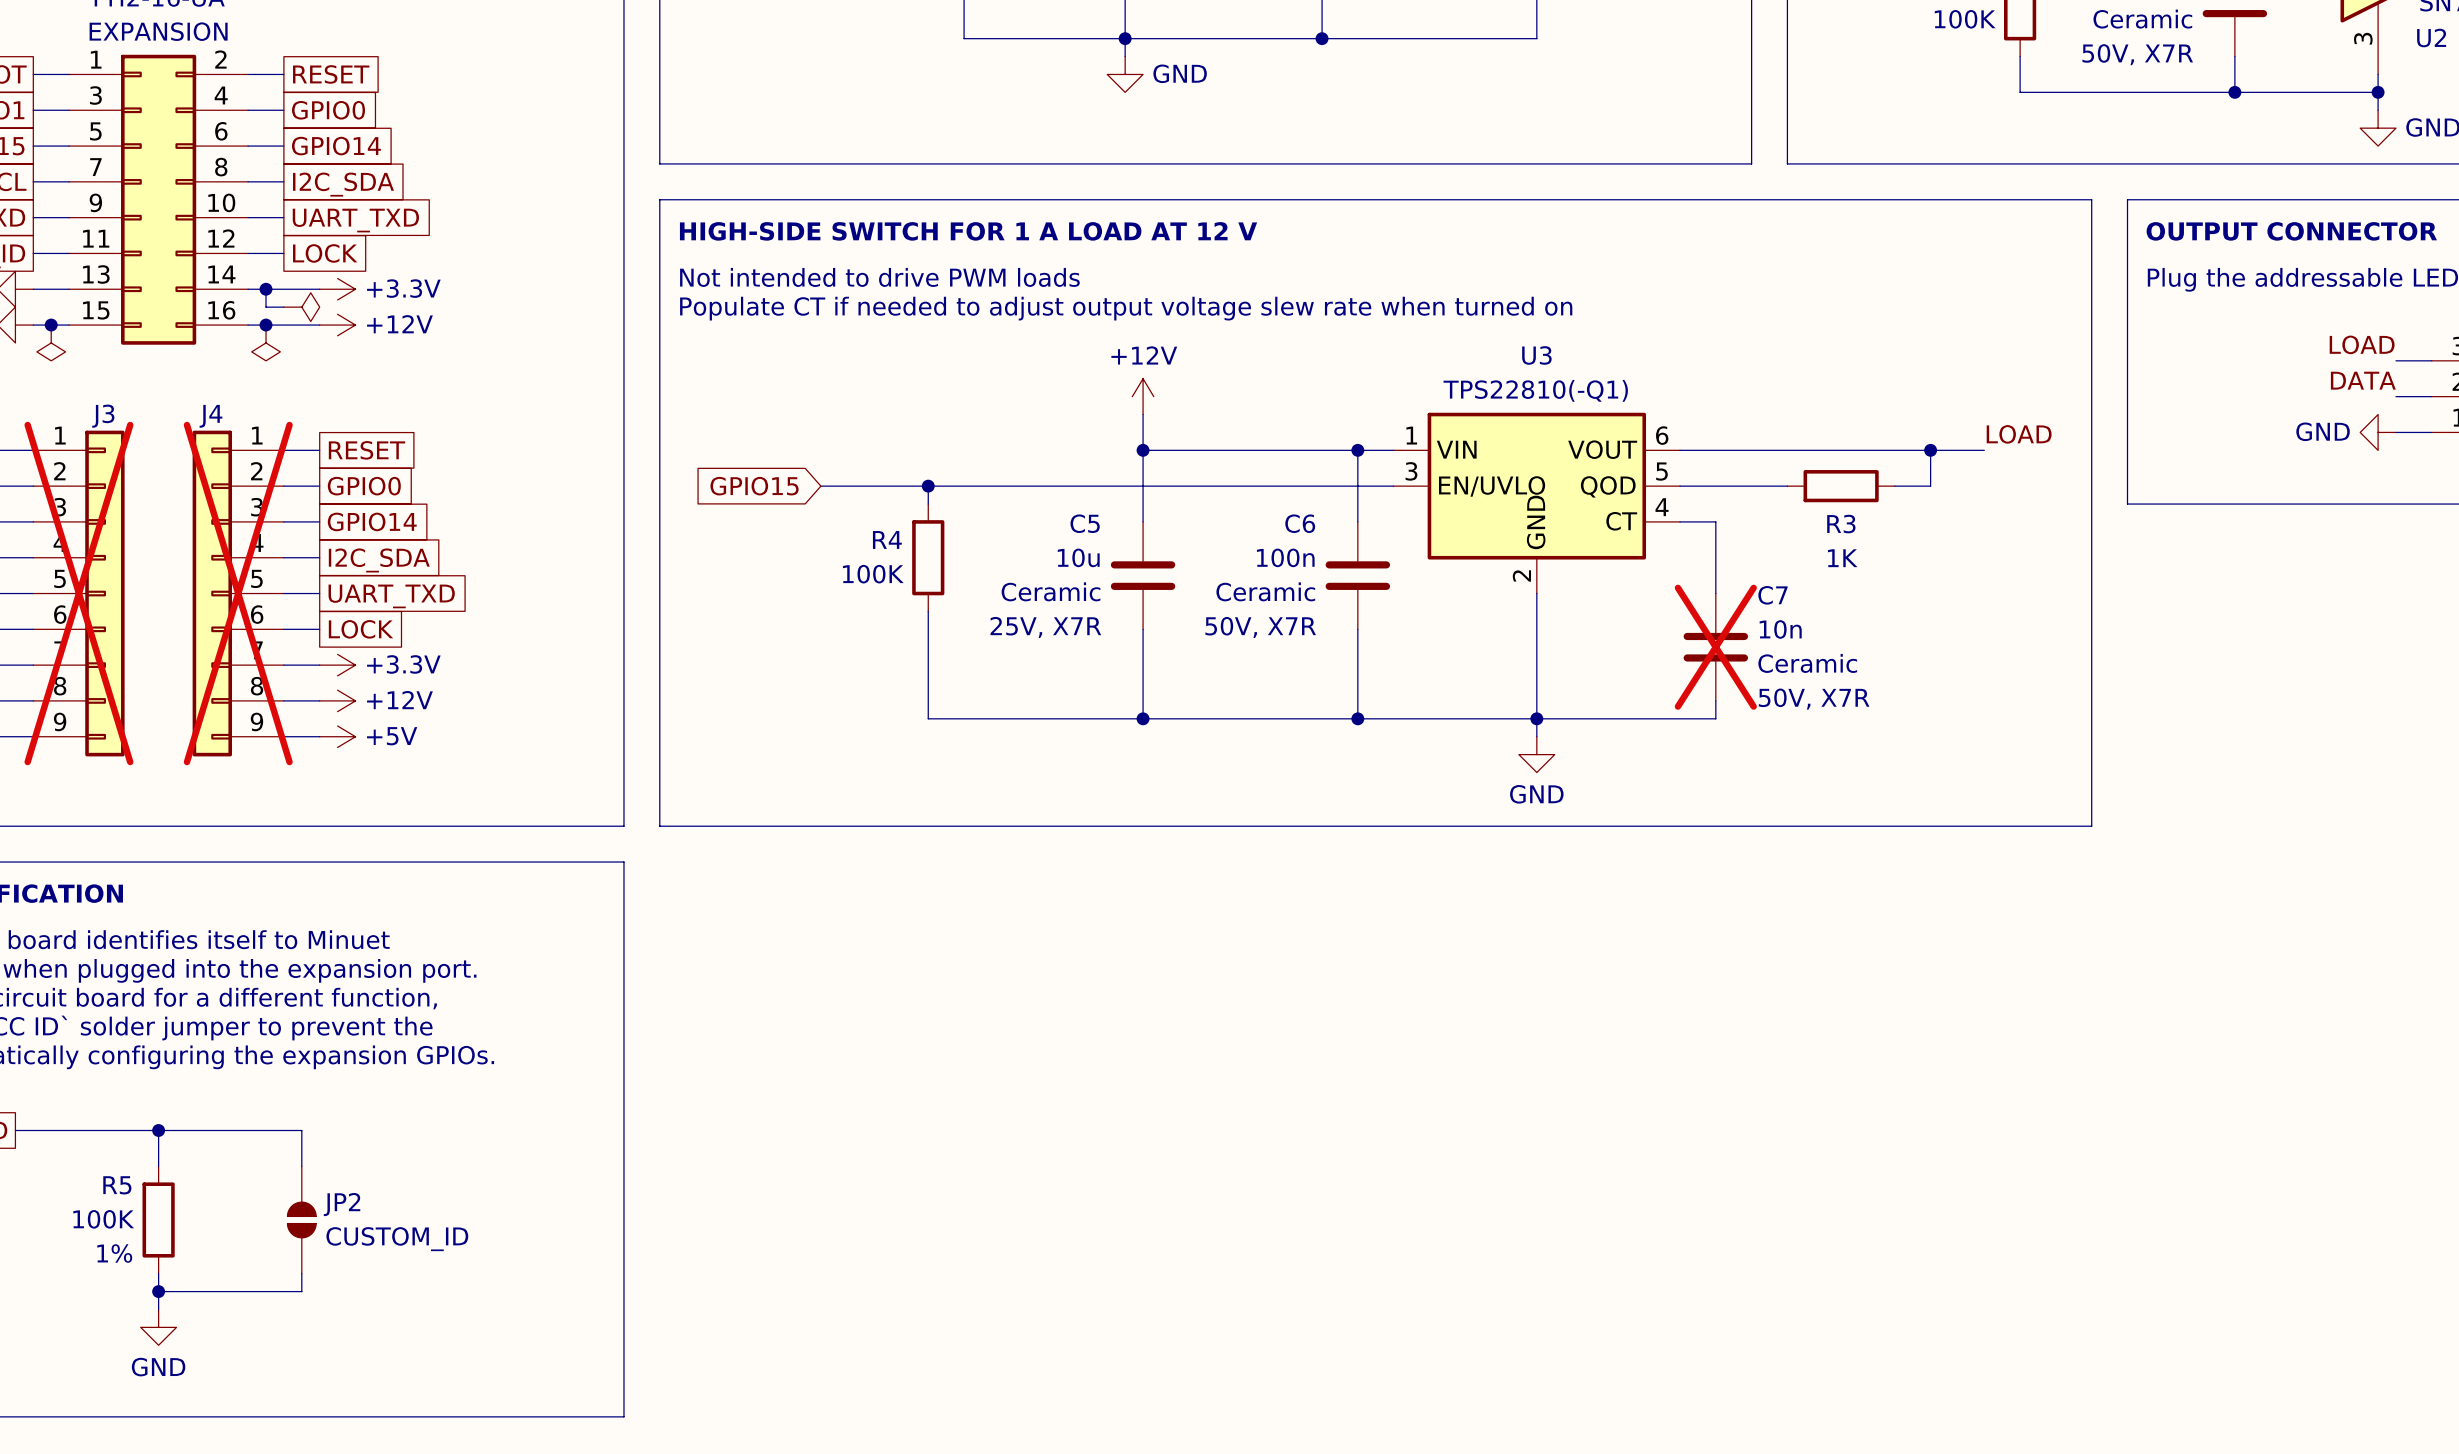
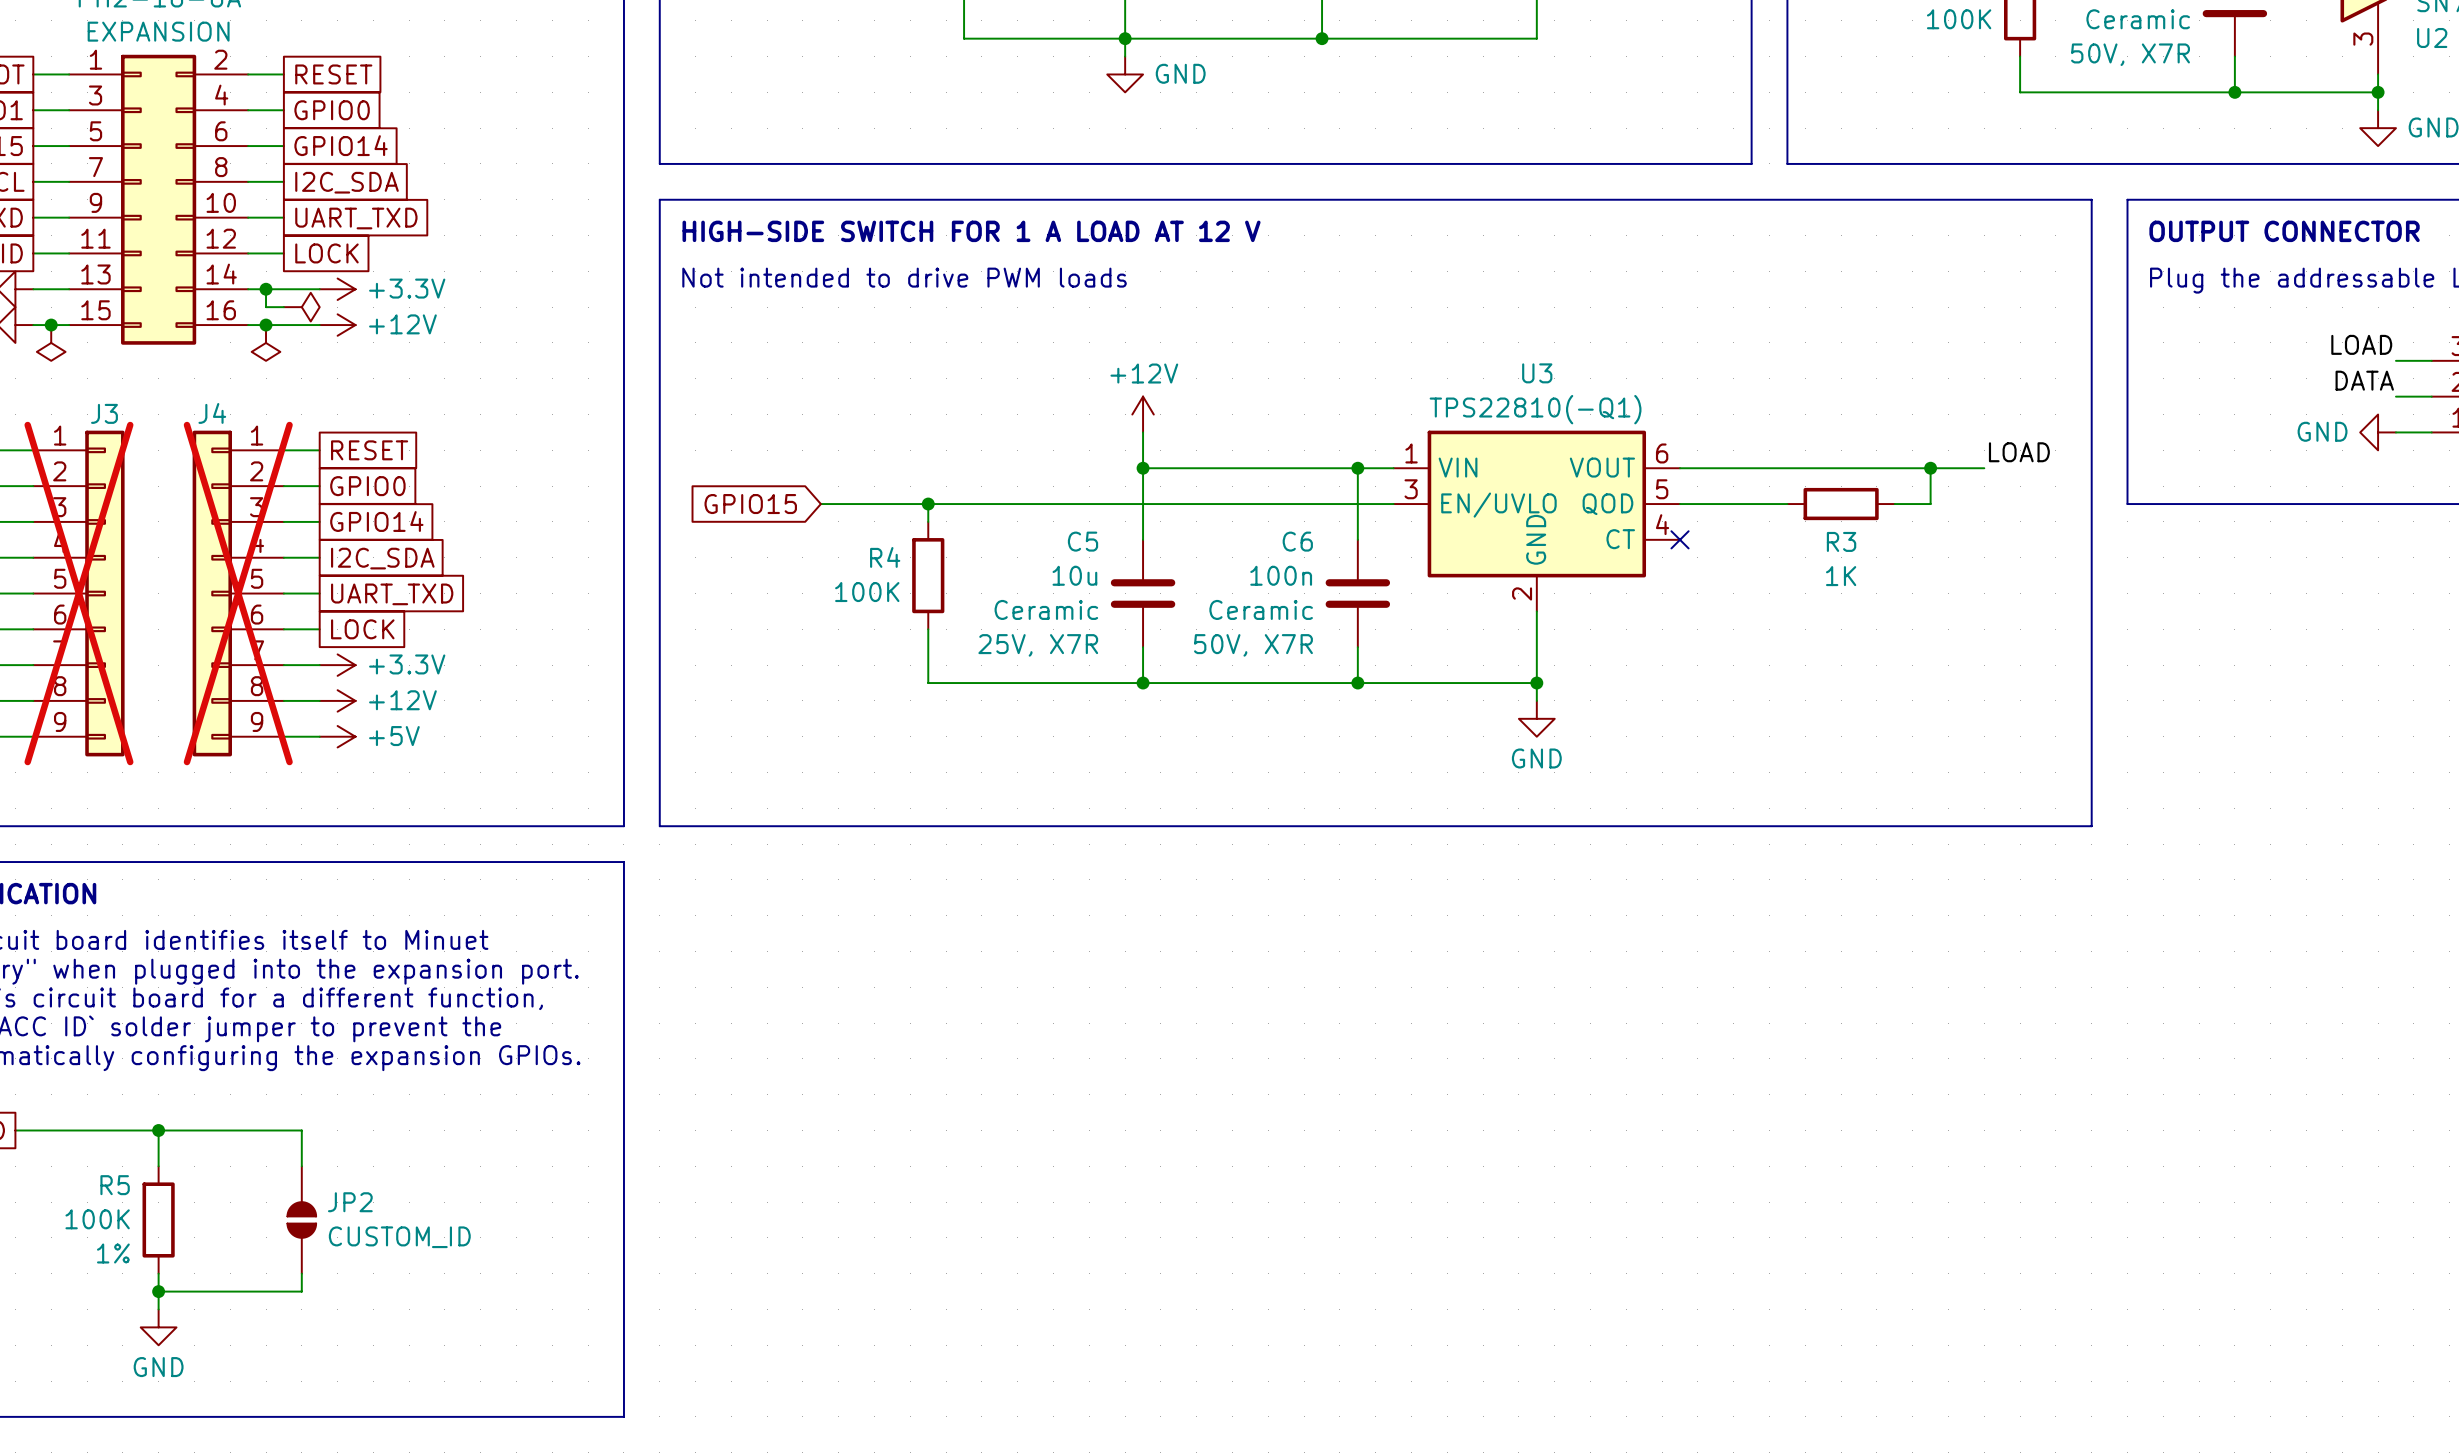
text: Populate CT if needed to adjust output voltage slew rate when turned on (1126, 308) -> none
power symbol position: +12V (1143, 396) -> +12V (1143, 414)
label position: LOAD (2019, 434) -> LOAD (2019, 452)
wire: (1143, 450) (1393, 450) -> (1143, 468) (1393, 468)
junction position: (1143, 450) -> (1143, 468)
wire: (1357, 450) (1357, 468) -> none
junction position: (1357, 450) -> (1357, 468)
wire: (1680, 450) (1984, 450) -> (1680, 468) (1984, 468)
wire: (1930, 450) (1930, 468) -> none
junction position: (1930, 450) -> (1930, 468)
global label position: GPIO15 (754, 486) -> GPIO15 (750, 504)
wire: (820, 486) (1393, 486) -> (820, 504) (1393, 504)
junction position: (928, 486) -> (928, 504)
wire: (1680, 486) (1787, 486) -> (1680, 504) (1787, 504)
R3 position: (1841, 486) -> (1841, 504)
wire: (1894, 486) (1930, 486) -> (1894, 504) (1930, 504) (1930, 486)
U3 position: (1536, 503) -> (1536, 521)
wire: (1680, 521) (1715, 521) (1715, 593) -> none
no-connect mark: none -> (1680, 539)
R4 position: (928, 557) -> (928, 575)
C5 position: (1143, 575) -> (1143, 593)
C6 position: (1357, 575) -> (1357, 593)
C7: 10n (1715, 647) -> none
wire: (928, 683) (928, 718) (1715, 718) (1715, 700) -> (928, 683) (1536, 683)
wire: (1143, 683) (1143, 718) -> none
wire: (1357, 683) (1357, 718) -> none
junction position: (1143, 718) -> (1143, 683)
junction position: (1357, 718) -> (1357, 683)
junction position: (1536, 718) -> (1536, 683)
power symbol position: GND (1536, 754) -> GND (1536, 718)

